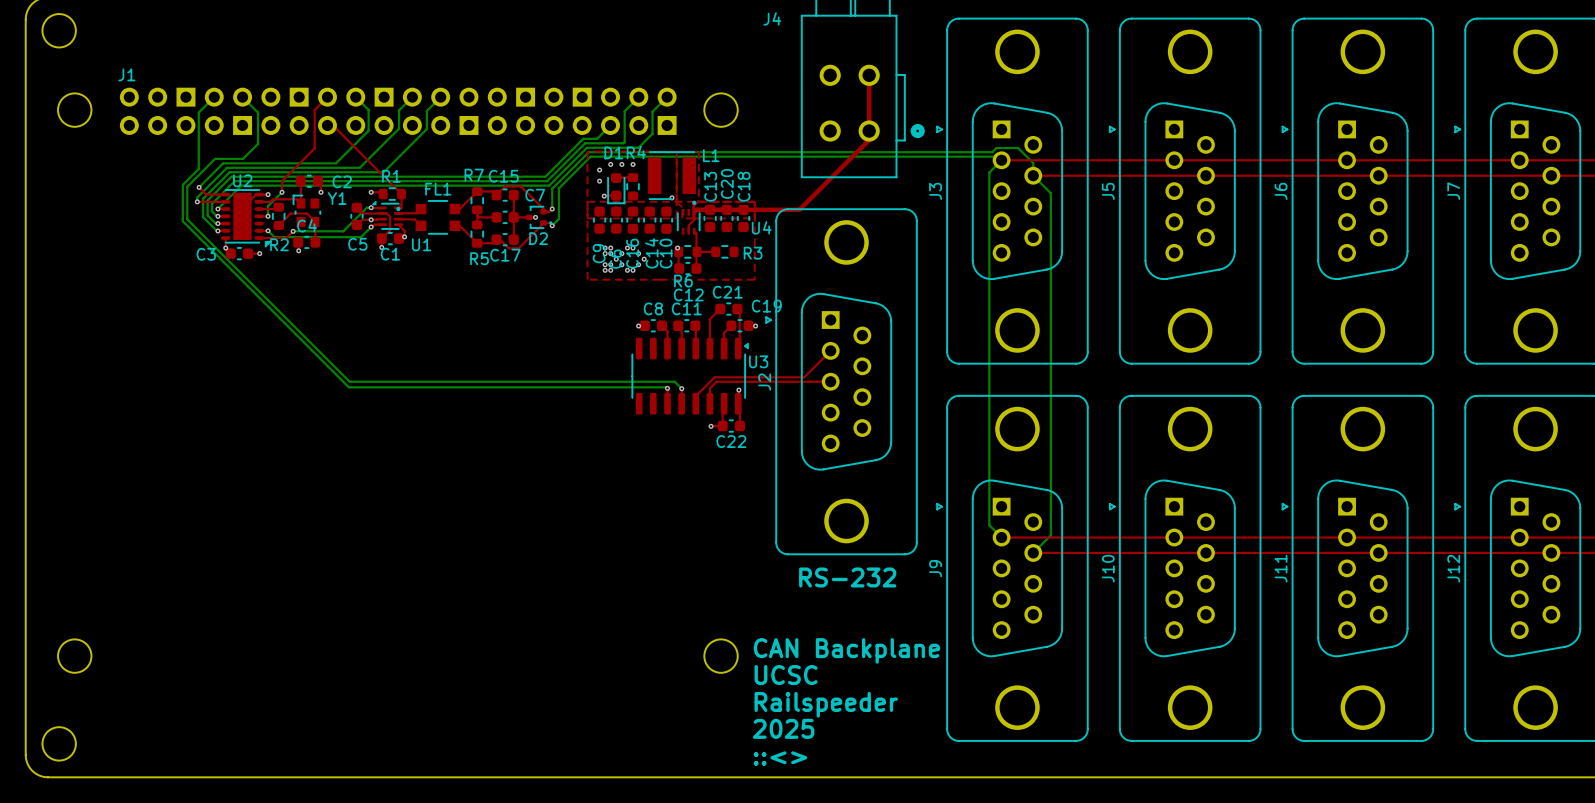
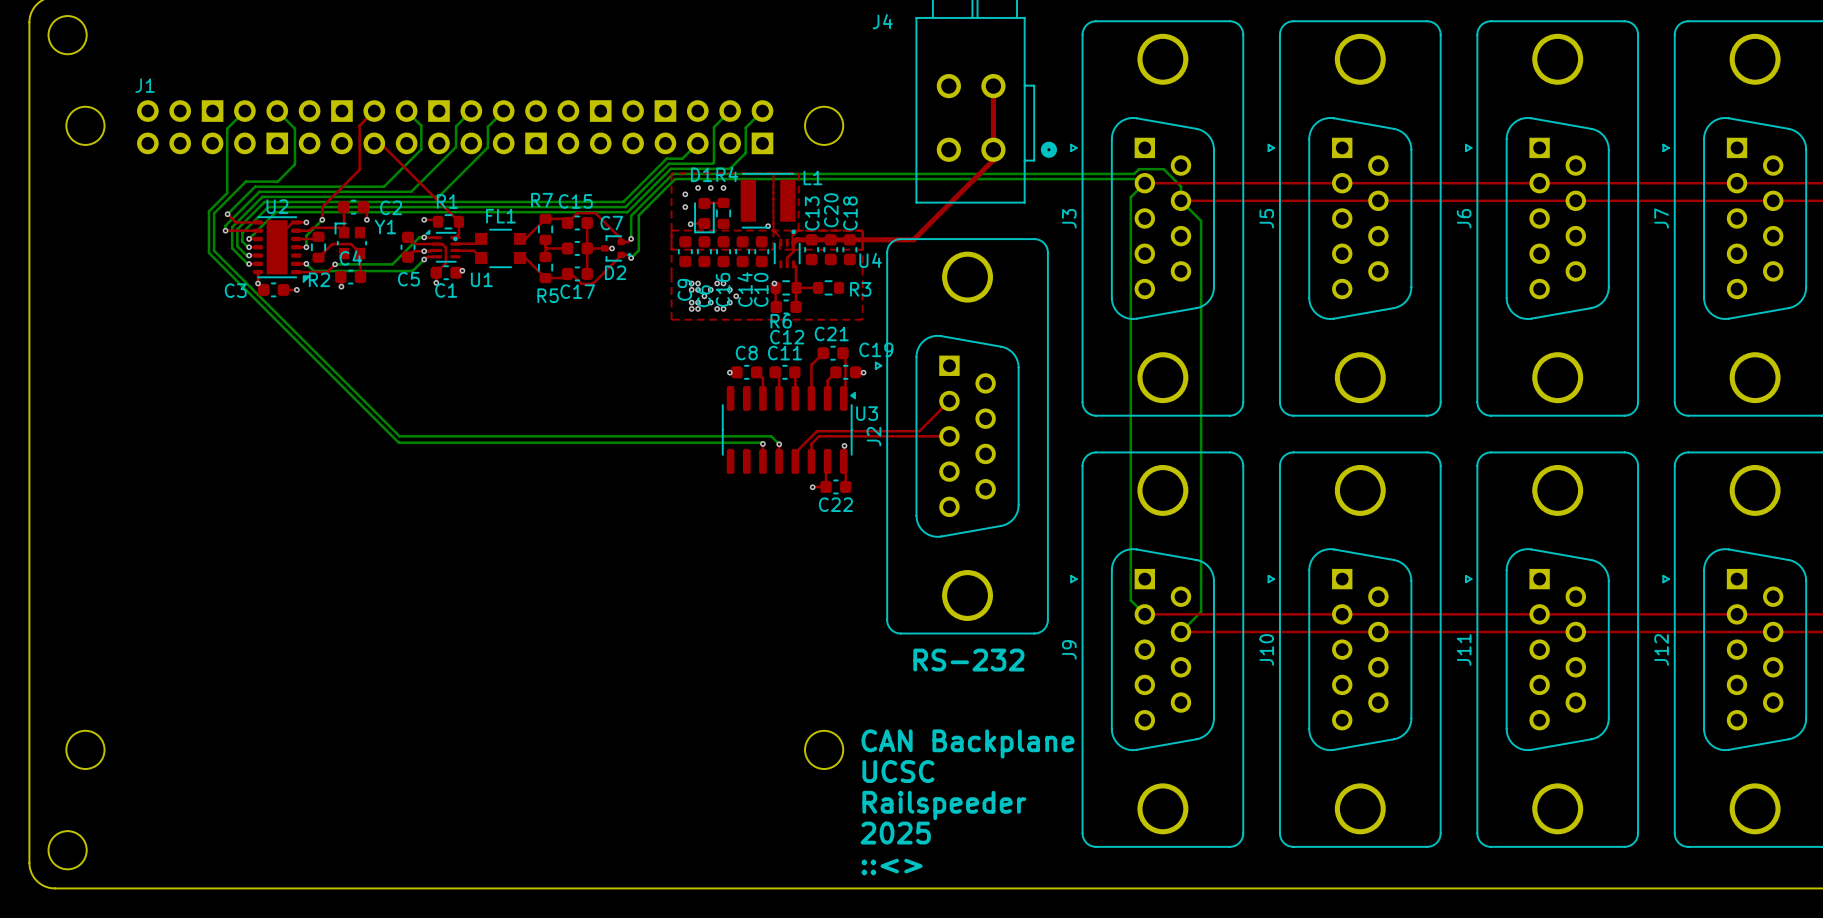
top track: (398, 224) (404, 230) (404, 236) -> none

